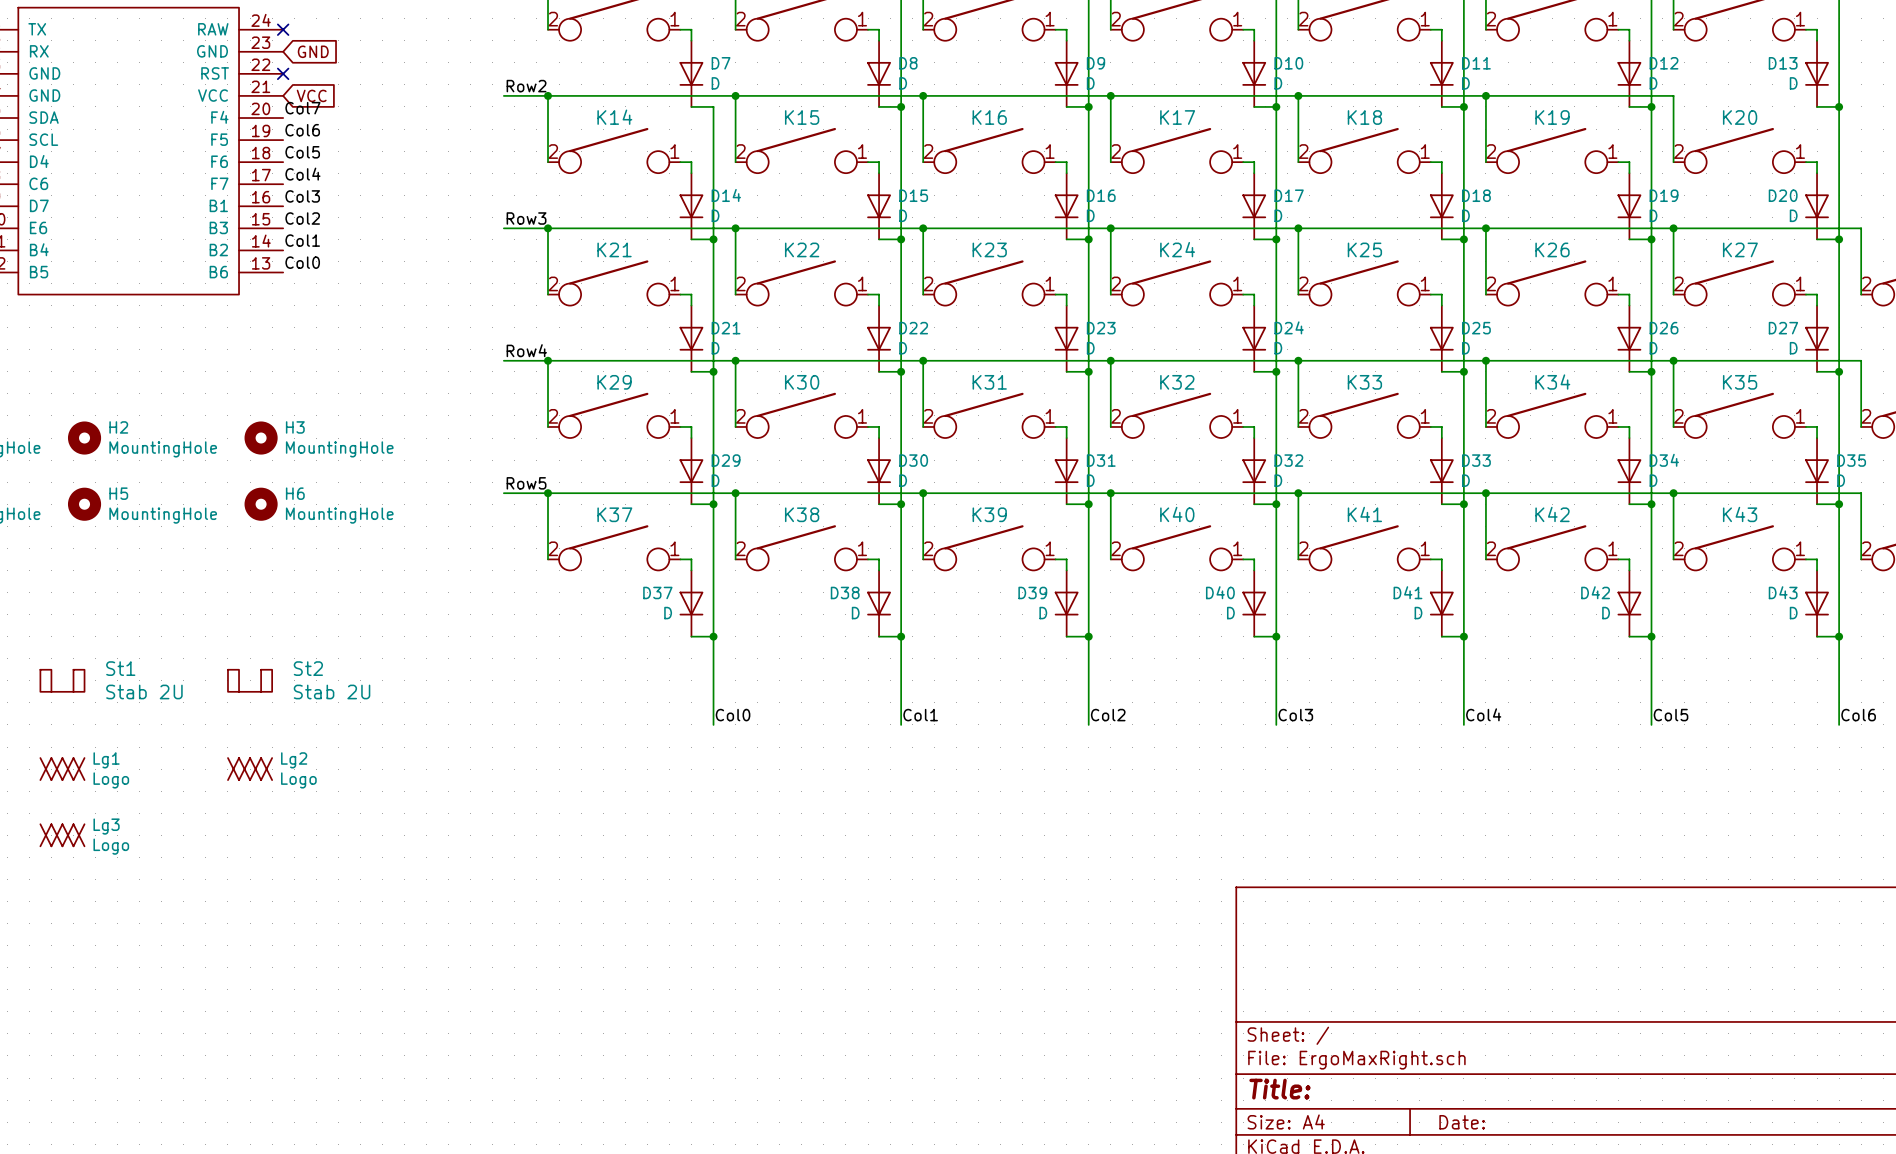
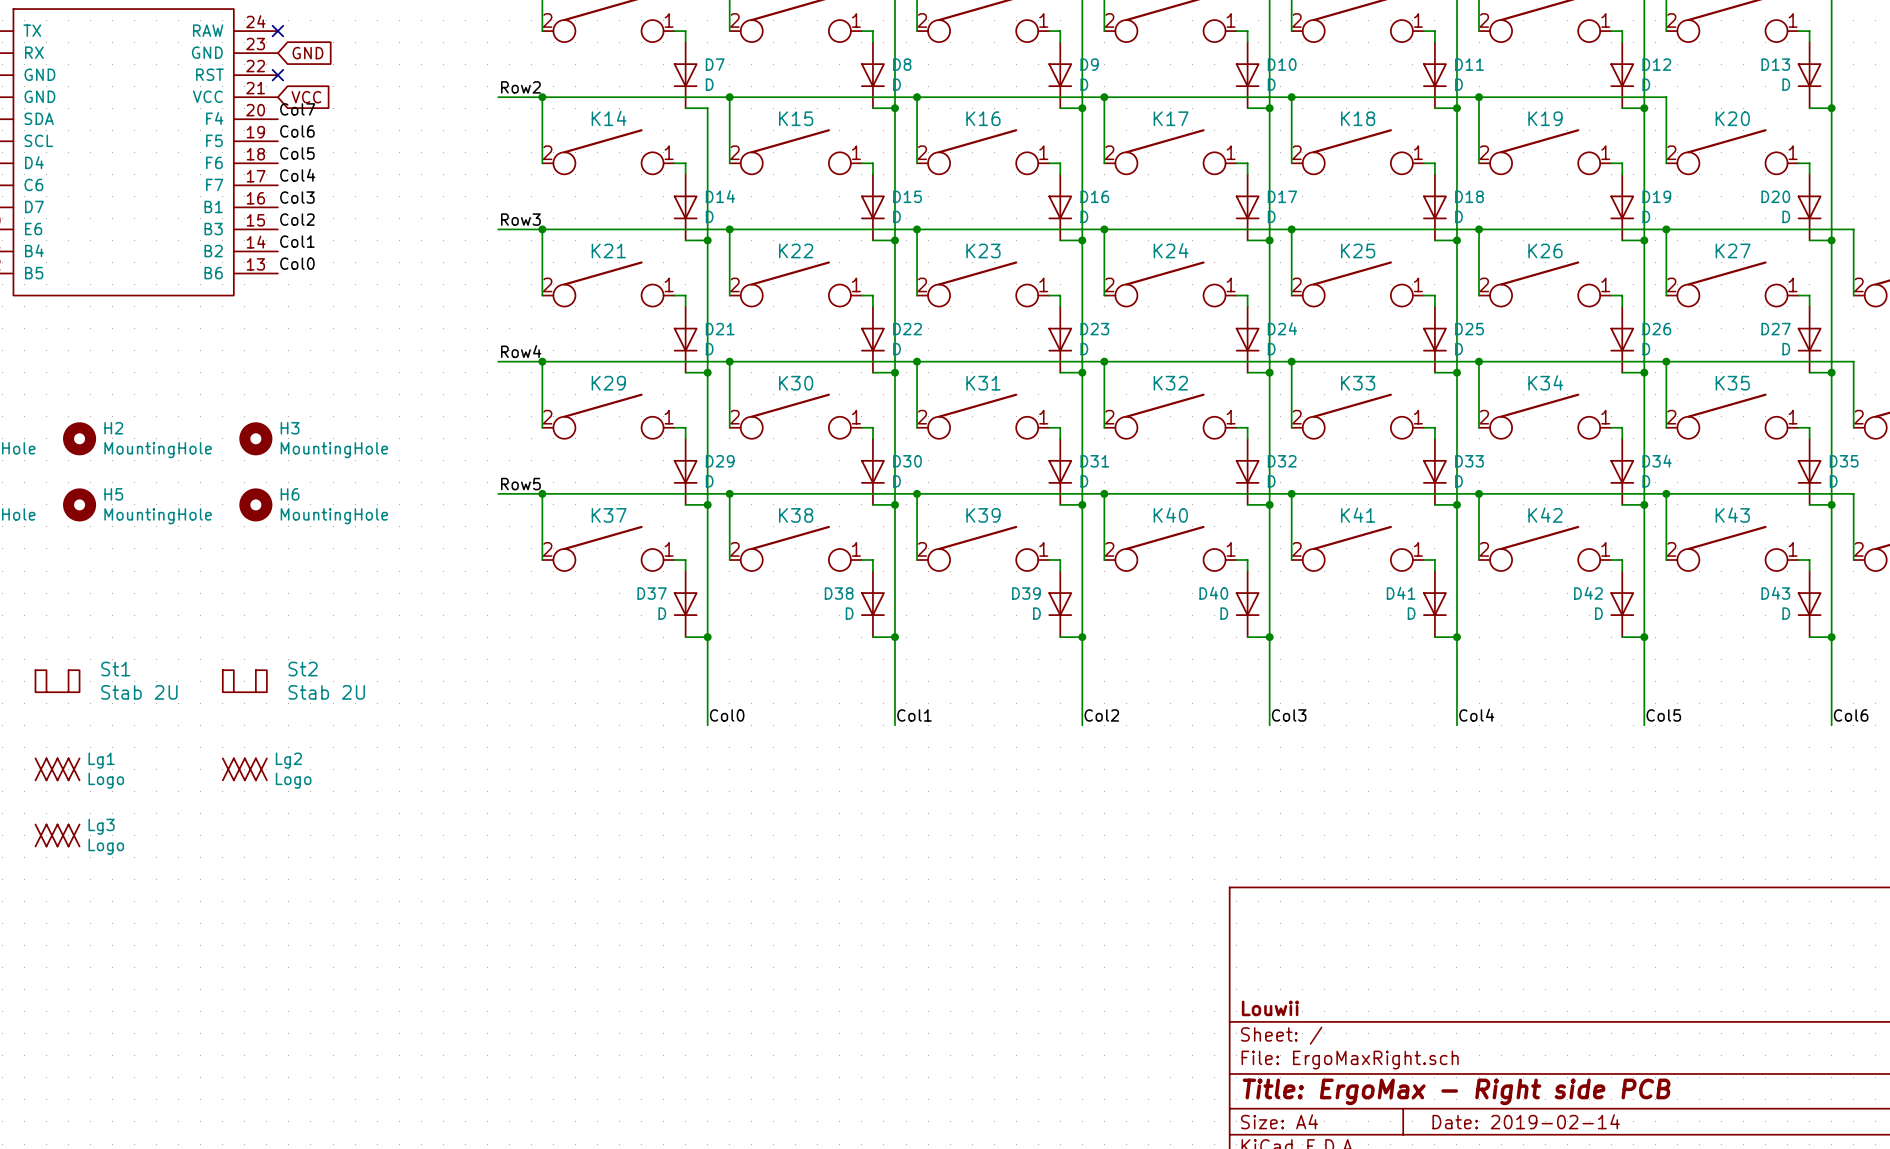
title block: none -> Louwii (1270, 1008)
title block: Title: (1279, 1089) -> Title: ErgoMax - Right side PCB (1456, 1091)
title block: Date: (1462, 1122) -> Date: 2019-02-14 (1526, 1121)

